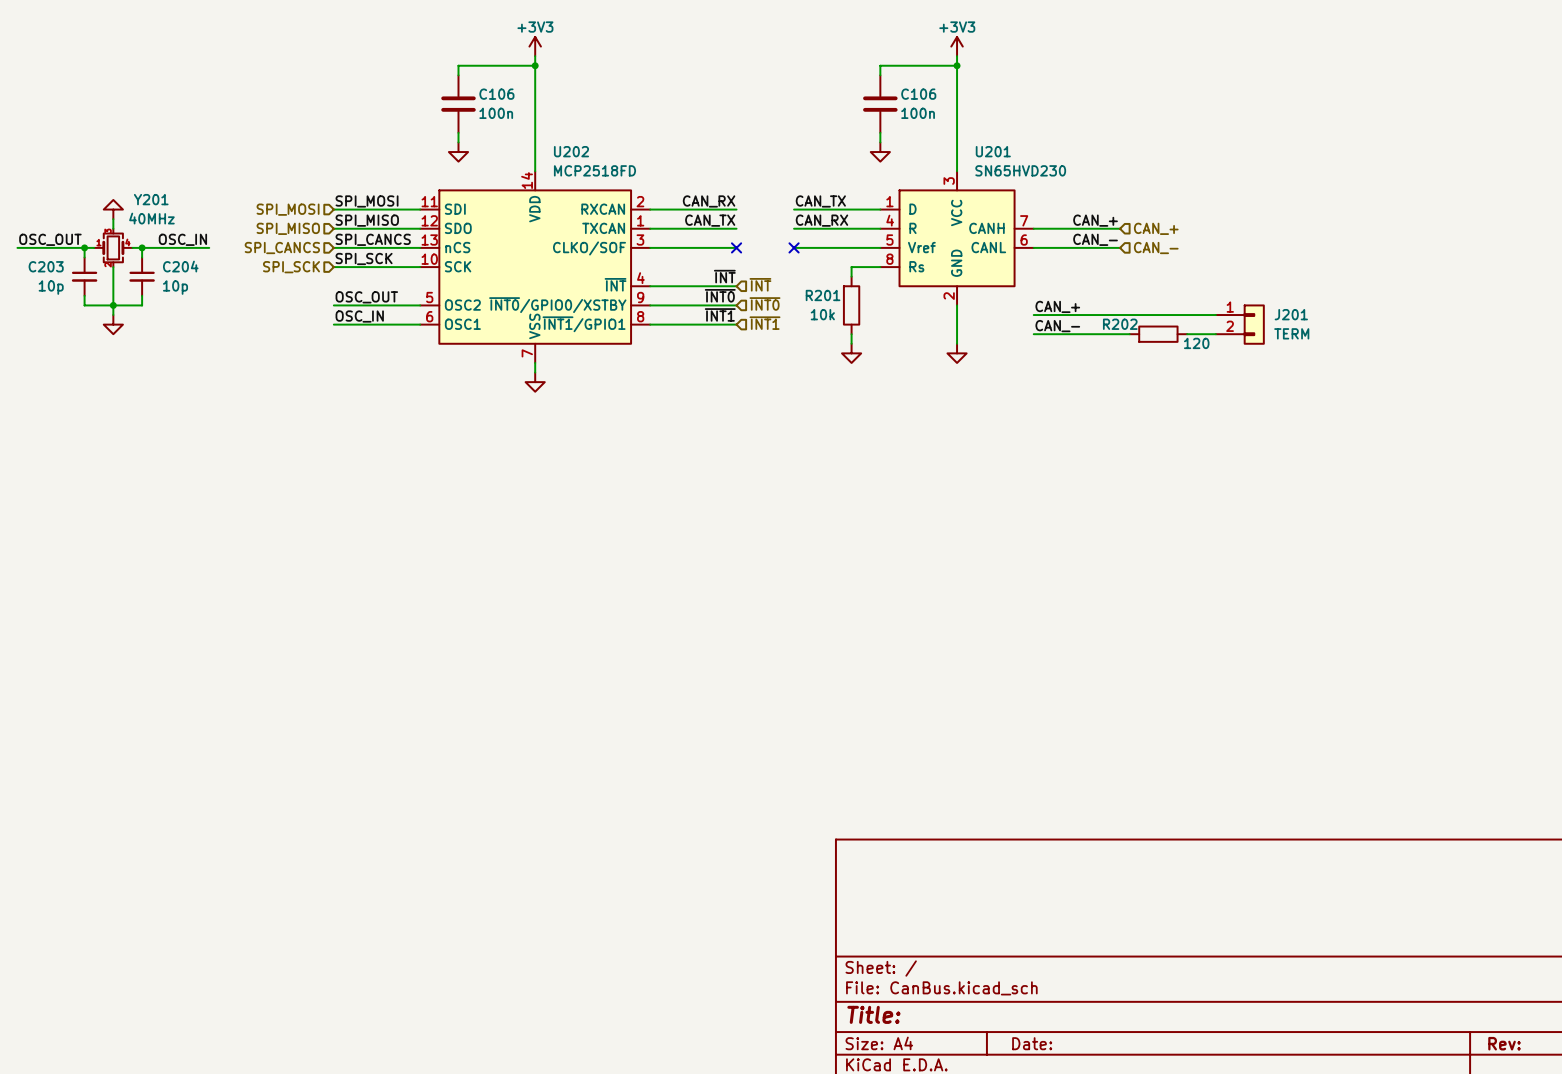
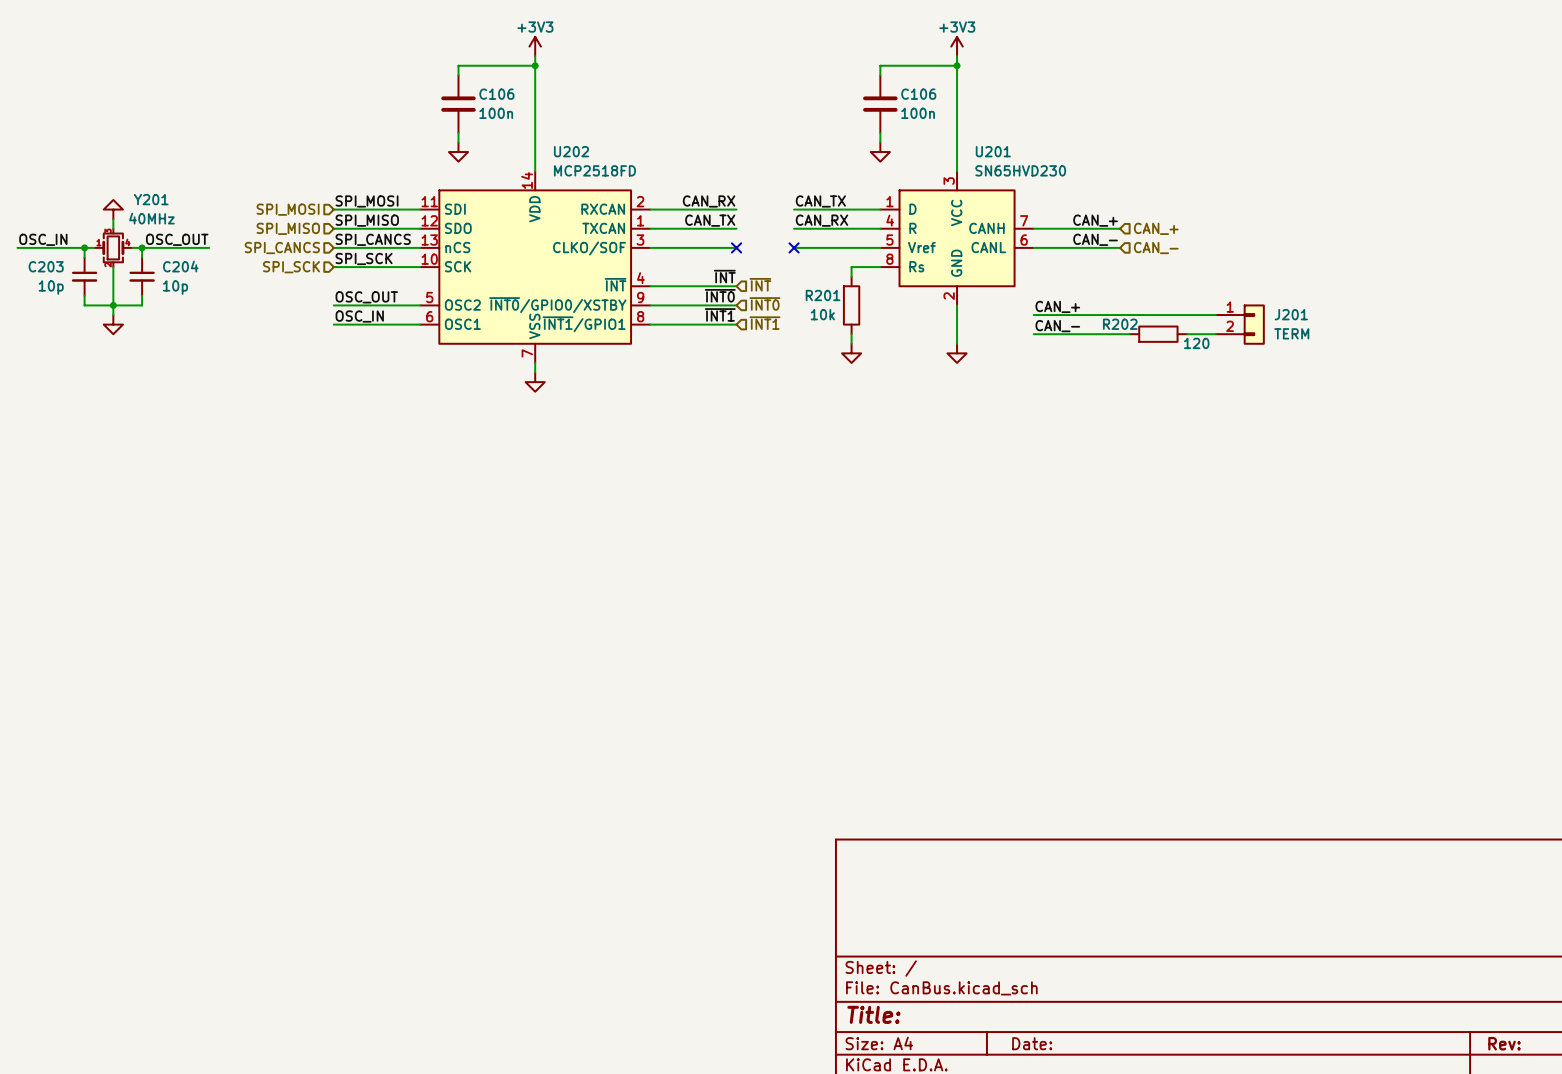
label: OSC_OUT (50, 239) -> OSC_IN (43, 239)
label: OSC_IN (182, 239) -> OSC_OUT (177, 239)

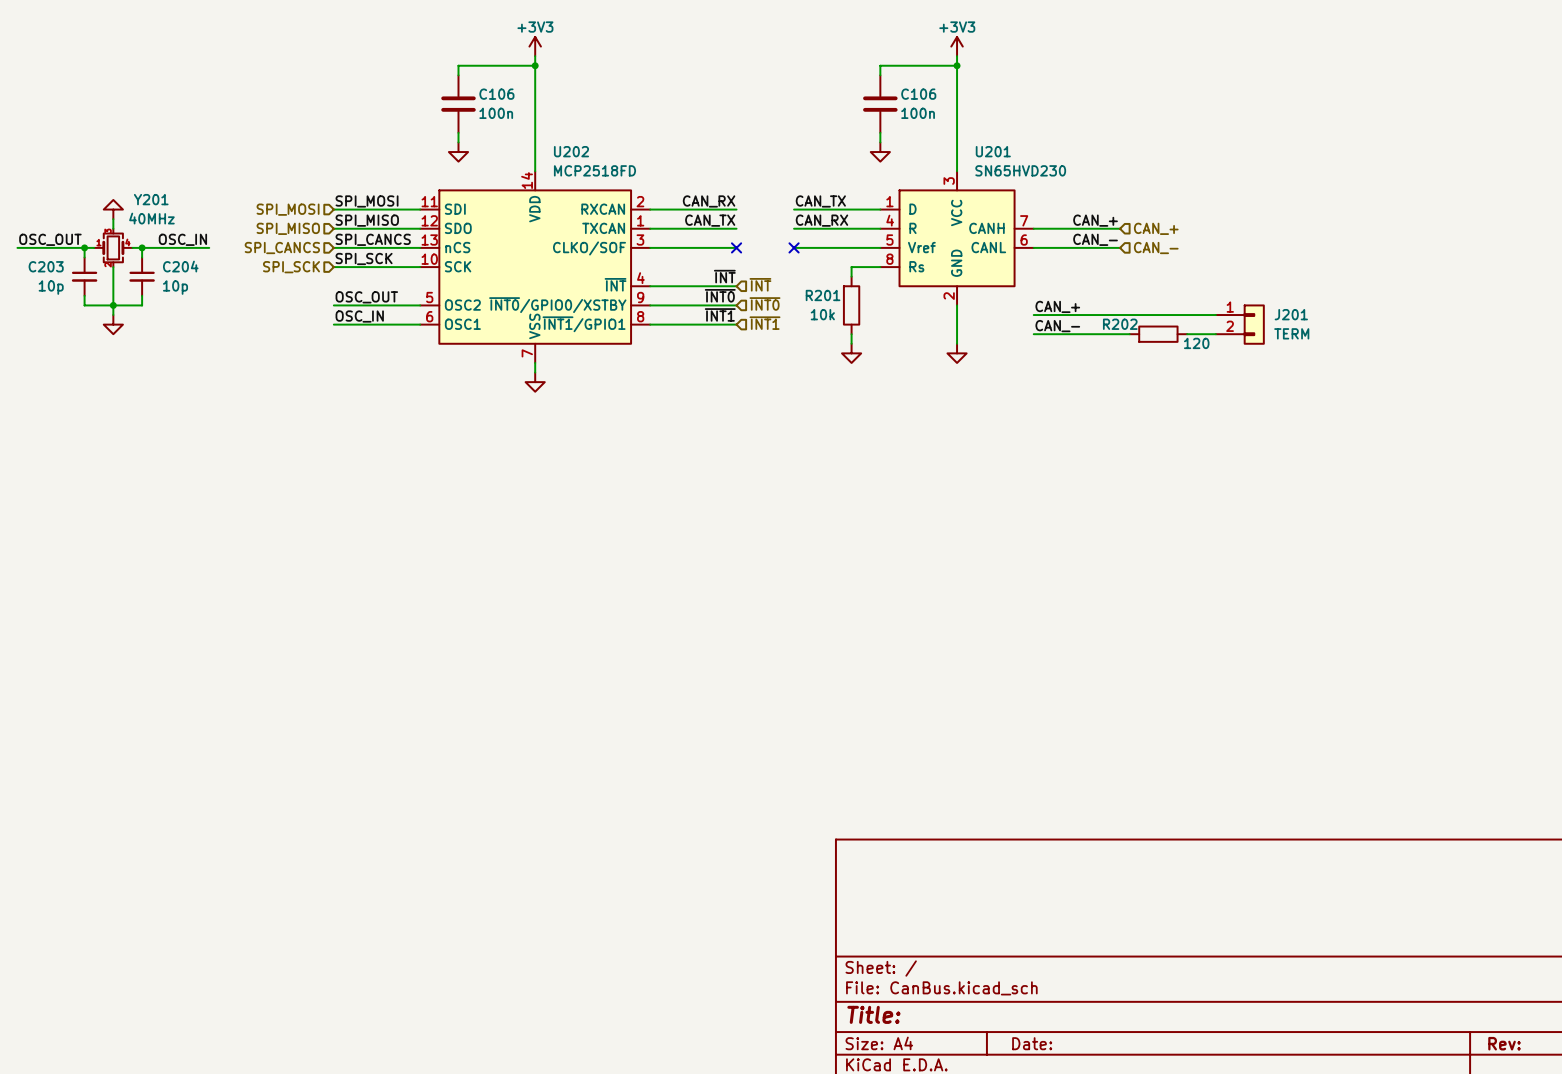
label: OSC_IN (43, 239) -> OSC_OUT (50, 239)
label: OSC_OUT (177, 239) -> OSC_IN (182, 239)

